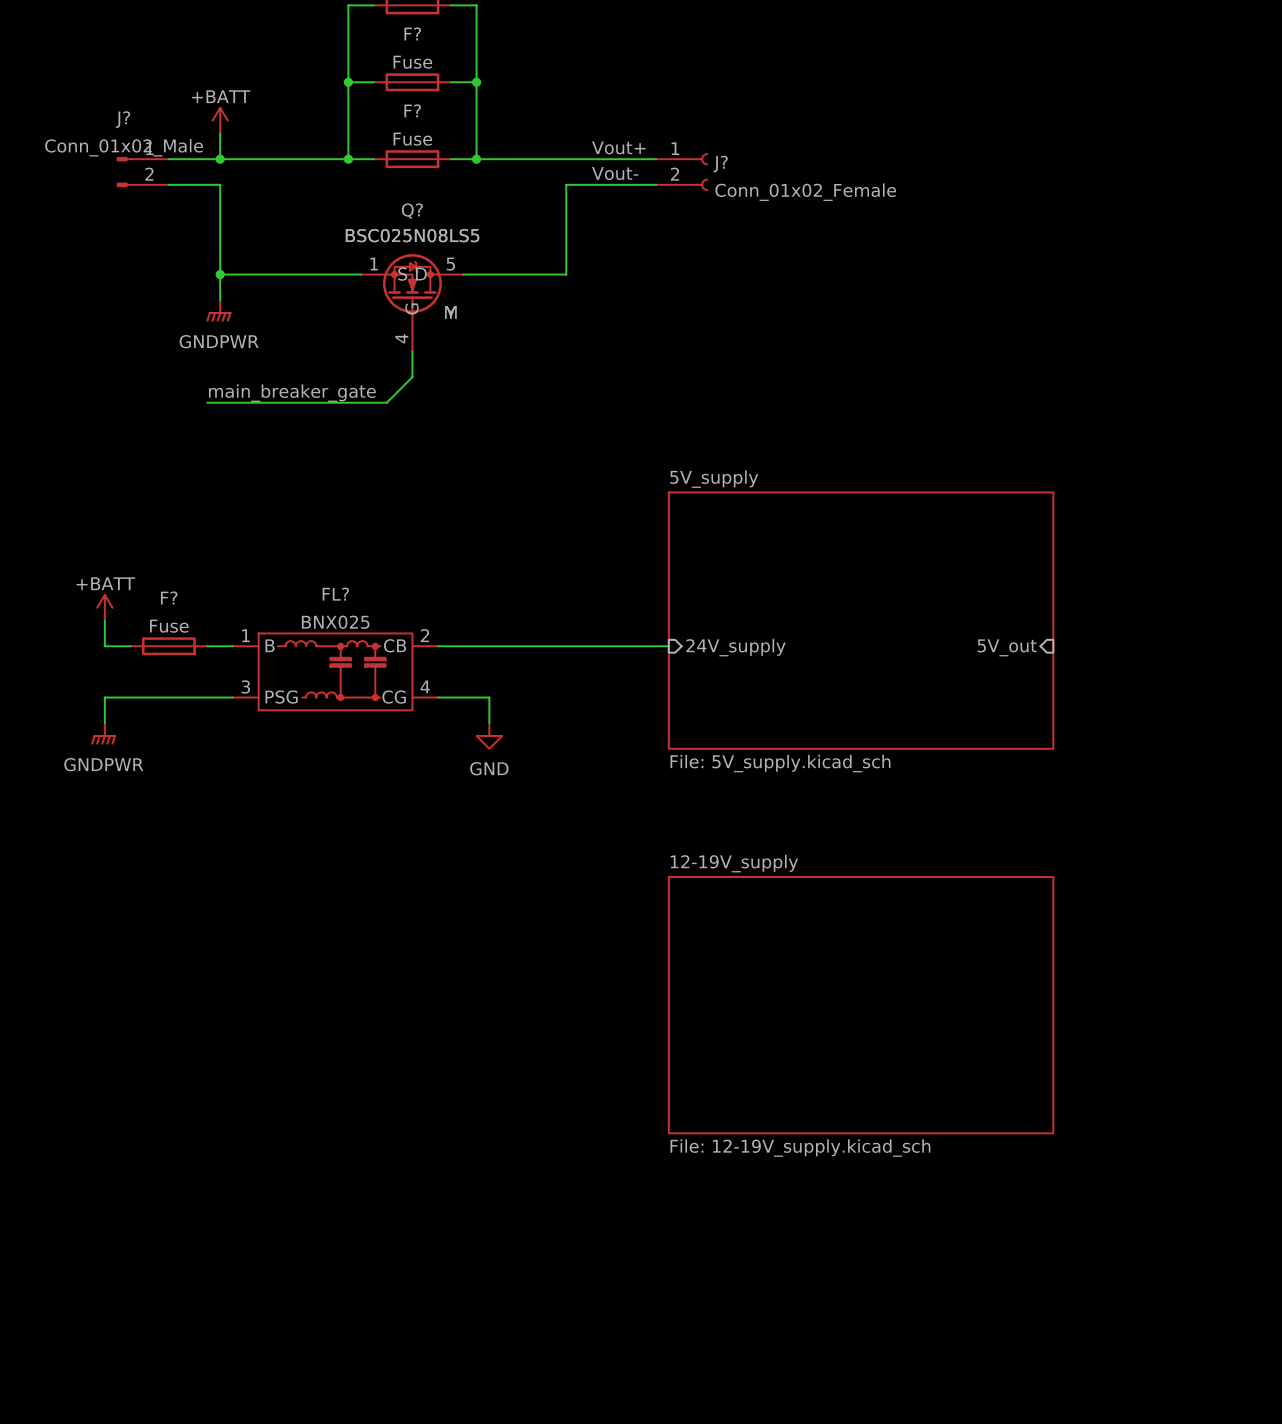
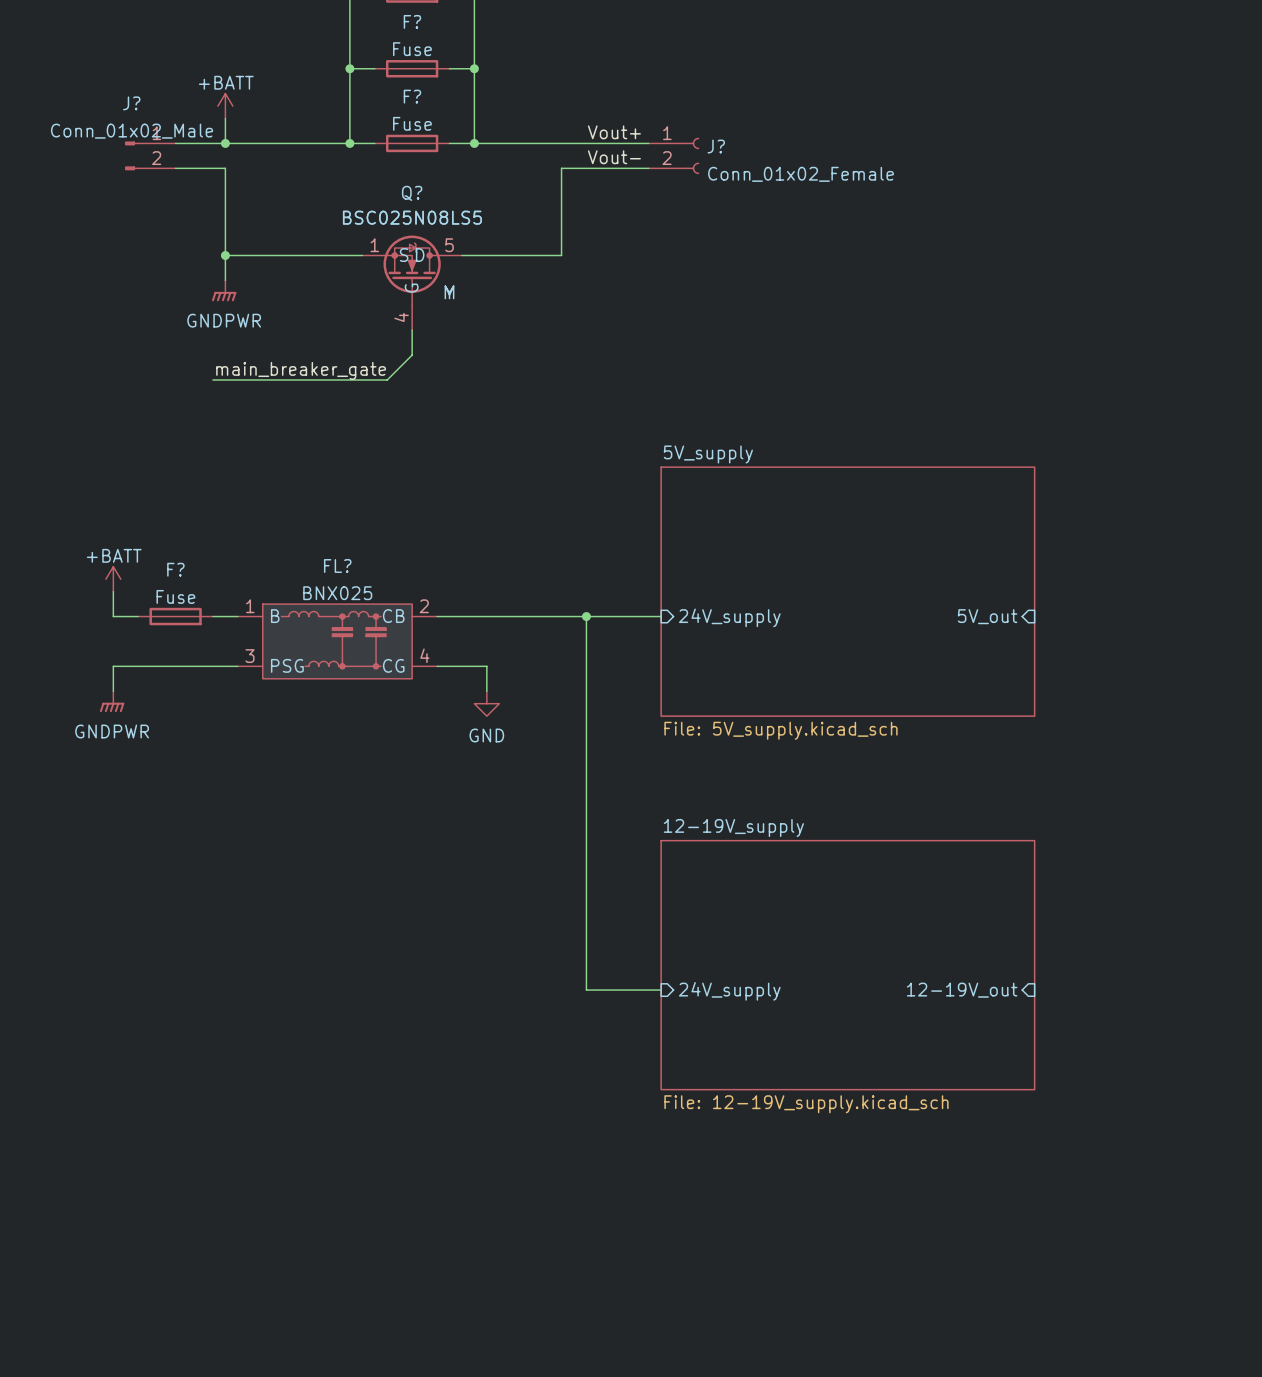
wire: none -> (586, 616) (586, 990) (661, 990)
junction: none -> (586, 616)
sheet pin: none -> 24V_supply (729, 991)
sheet pin: none -> 12-19V_out (962, 990)

